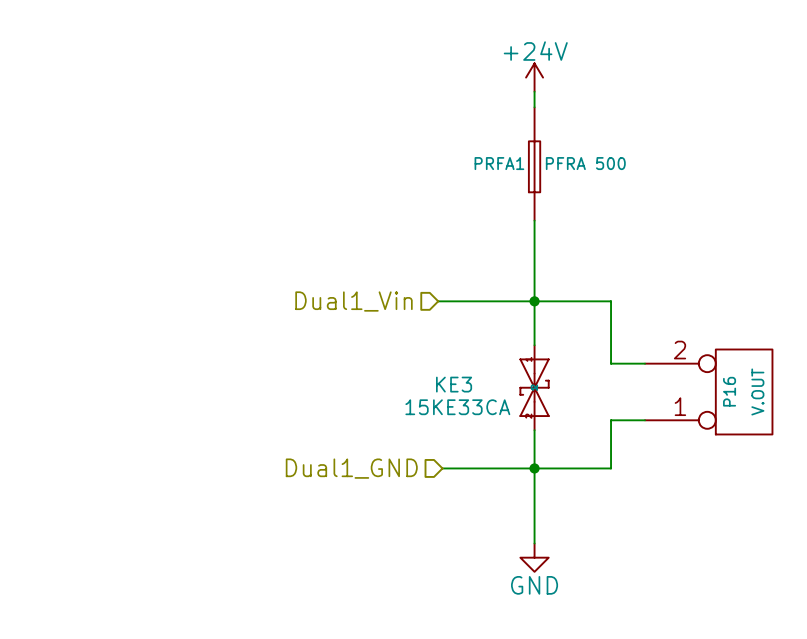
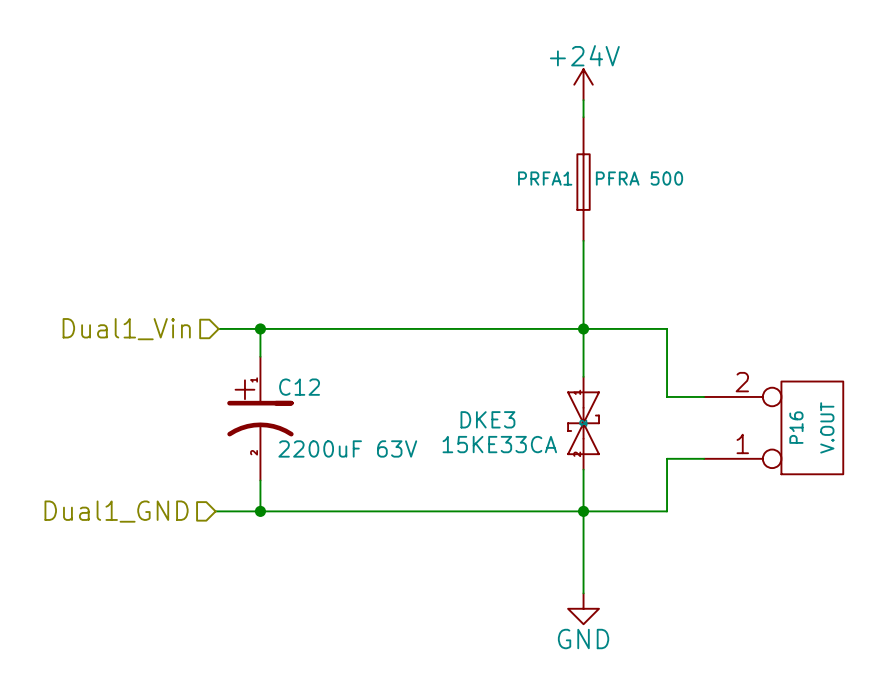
wire: none -> (218, 328) (478, 328)
wire: none -> (260, 328) (260, 356)
junction: none -> (260, 328)
hierarchical label position: Dual1_Vin (353, 301) -> Dual1_Vin (126, 329)
C12: none -> 2200uF 63V (260, 418)
KE3 name: KE3 (454, 384) -> DKE3 (487, 419)
wire: none -> (260, 480) (260, 511)
wire: none -> (215, 511) (483, 511)
junction: none -> (260, 511)
hierarchical label position: Dual1_GND (351, 468) -> Dual1_GND (116, 511)

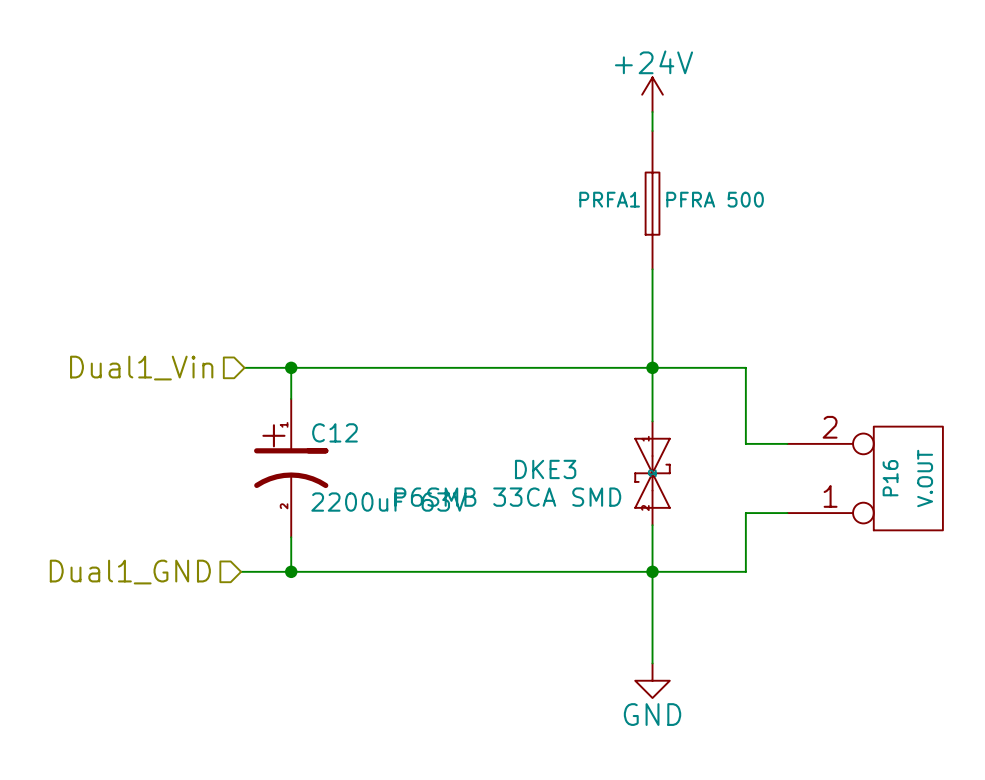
DKE3 value: 15KE33CA (499, 444) -> P6SMB 33CA SMD (507, 497)

